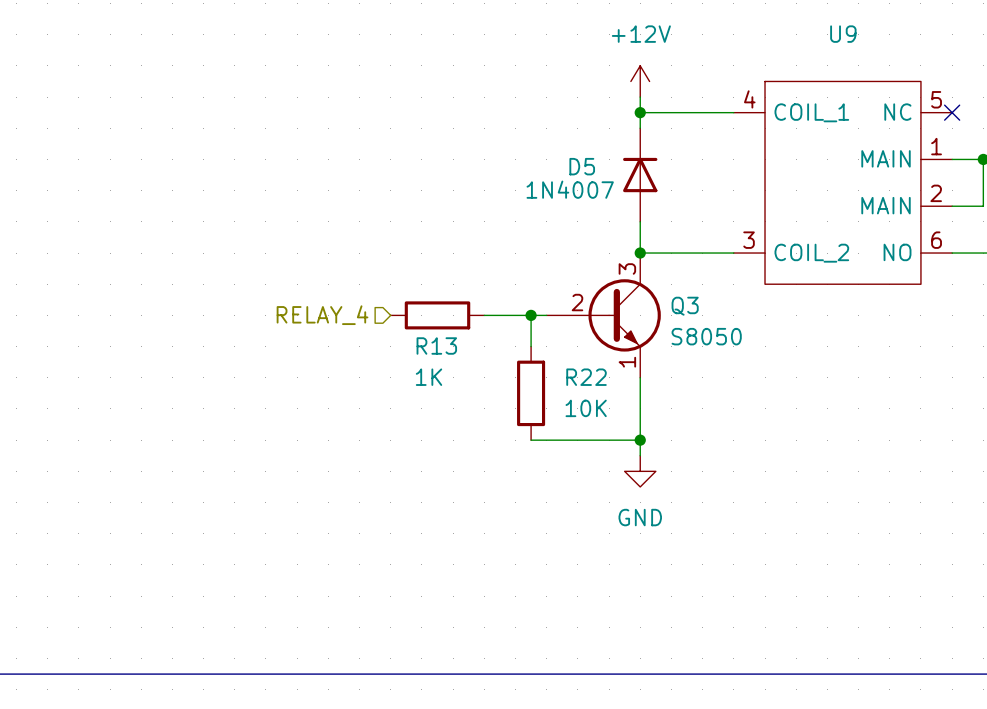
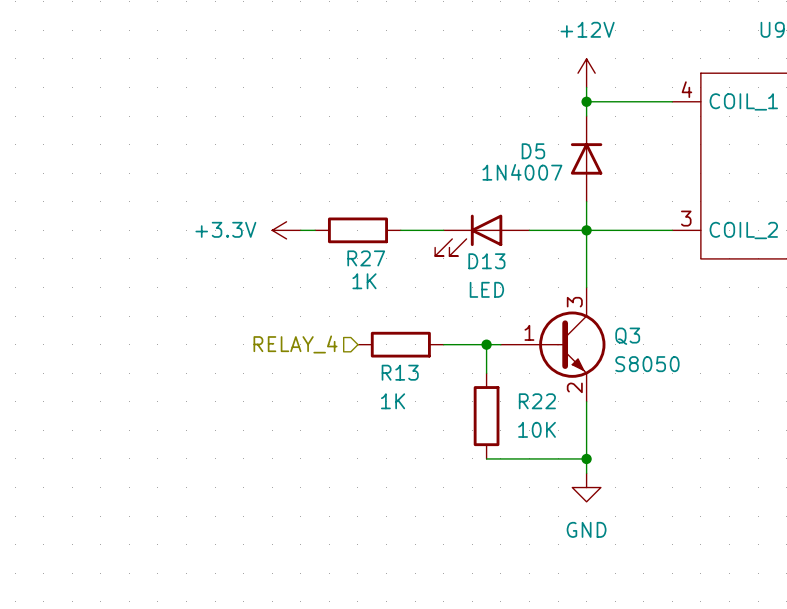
power symbol: none -> +3.3V (286, 230)
wire: none -> (300, 230) (315, 230)
R27: none -> 1K (357, 230)
wire: none -> (400, 230) (443, 230)
wire: none -> (529, 230) (586, 230) (586, 287)
D13: none -> LED (482, 235)
Q3 pin number: 2 (577, 302) -> 1 (529, 332)
hierarchical label position: RELAY_4 (322, 315) -> RELAY_4 (295, 344)
R13 position: (437, 315) -> (400, 344)
wire: (484, 315) (546, 315) -> (443, 344) (500, 344)
wire: (531, 315) (531, 346) -> (486, 344) (486, 373)
junction position: (531, 315) -> (486, 344)
Q3 position: (603, 315) -> (553, 344)
Q3 pin number: 1 (627, 362) -> 2 (574, 387)
wire: (640, 377) (640, 440) (531, 440) -> none
R22 position: (531, 393) -> (486, 416)
junction position: (640, 440) -> (586, 458)
wire: none -> (586, 416) (586, 473)
power symbol position: GND (640, 471) -> GND (586, 487)
wire: none -> (486, 458) (586, 458)

